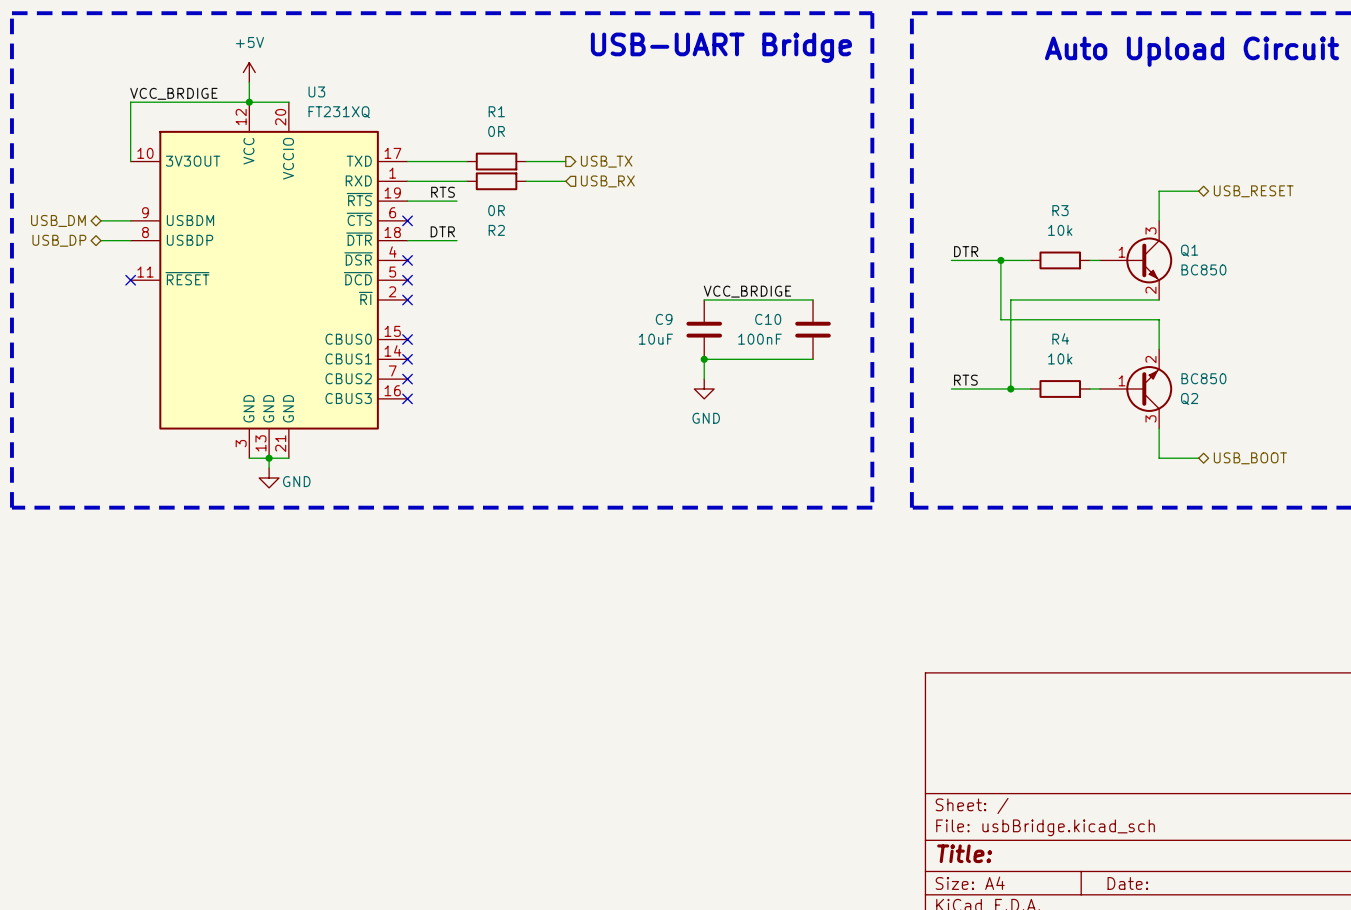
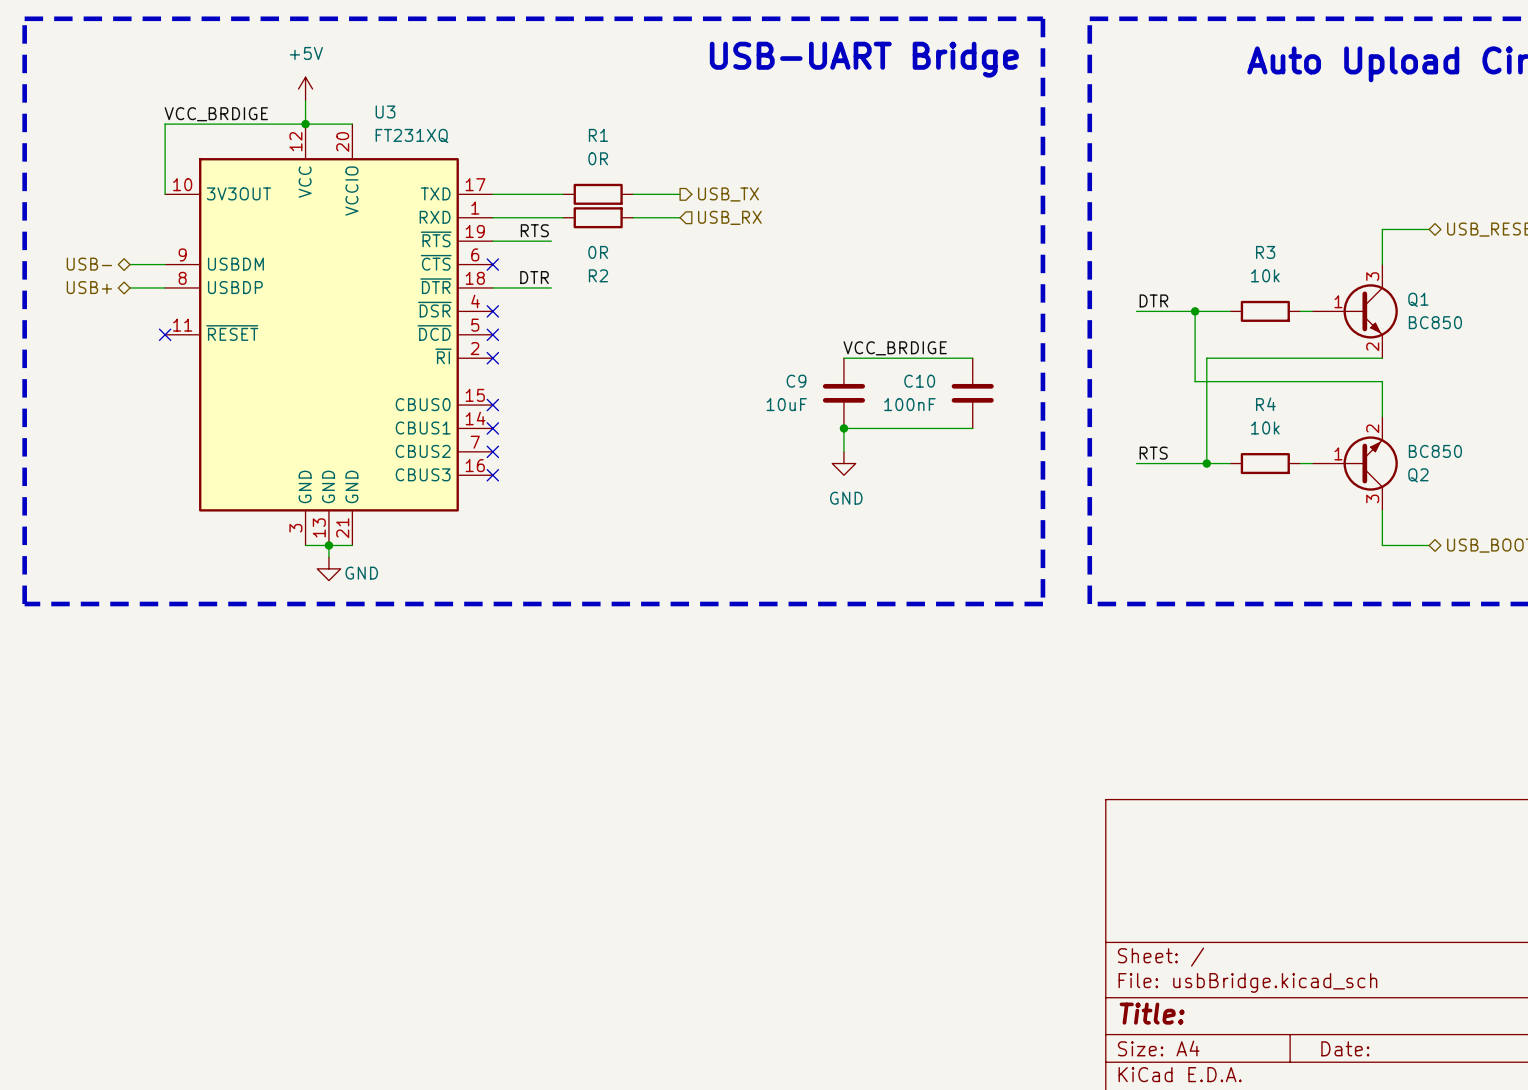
hierarchical label: USB_DM (58, 220) -> USB- (89, 264)
hierarchical label: USB_DP (59, 240) -> USB+ (89, 287)

